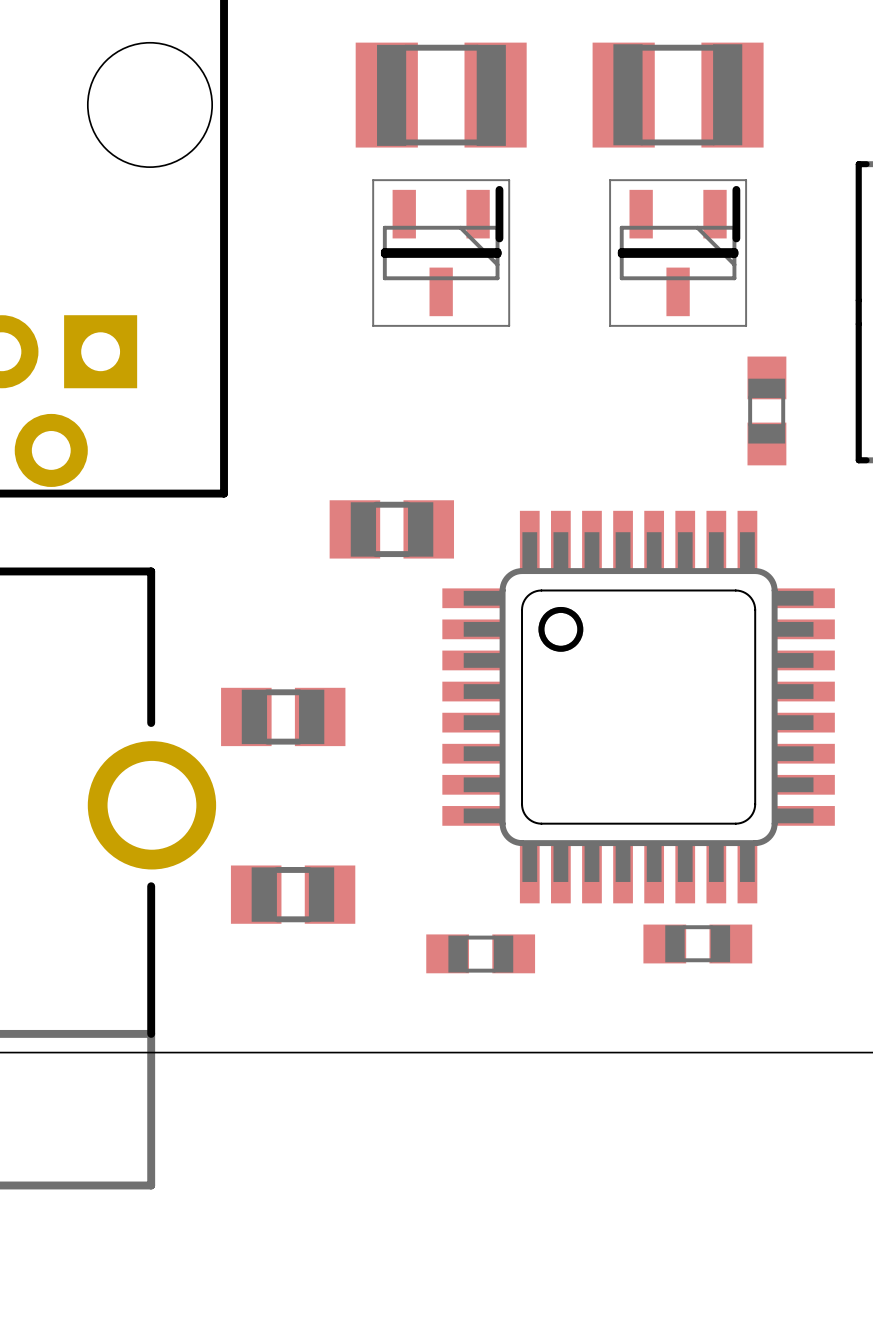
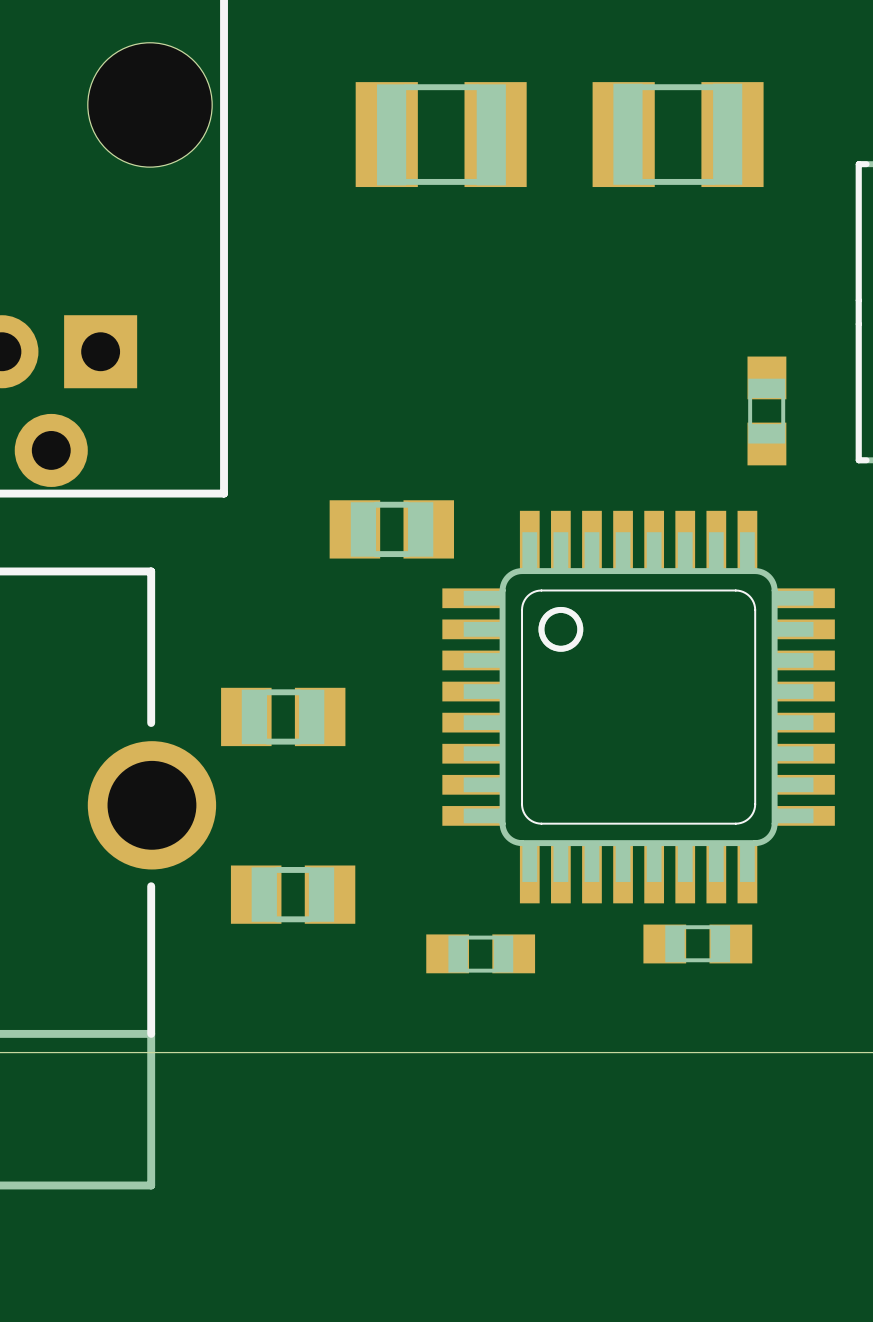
part position: (441, 95) -> (441, 134)
part position: (678, 95) -> (678, 134)
part: (441, 253) -> none
part: (678, 253) -> none

